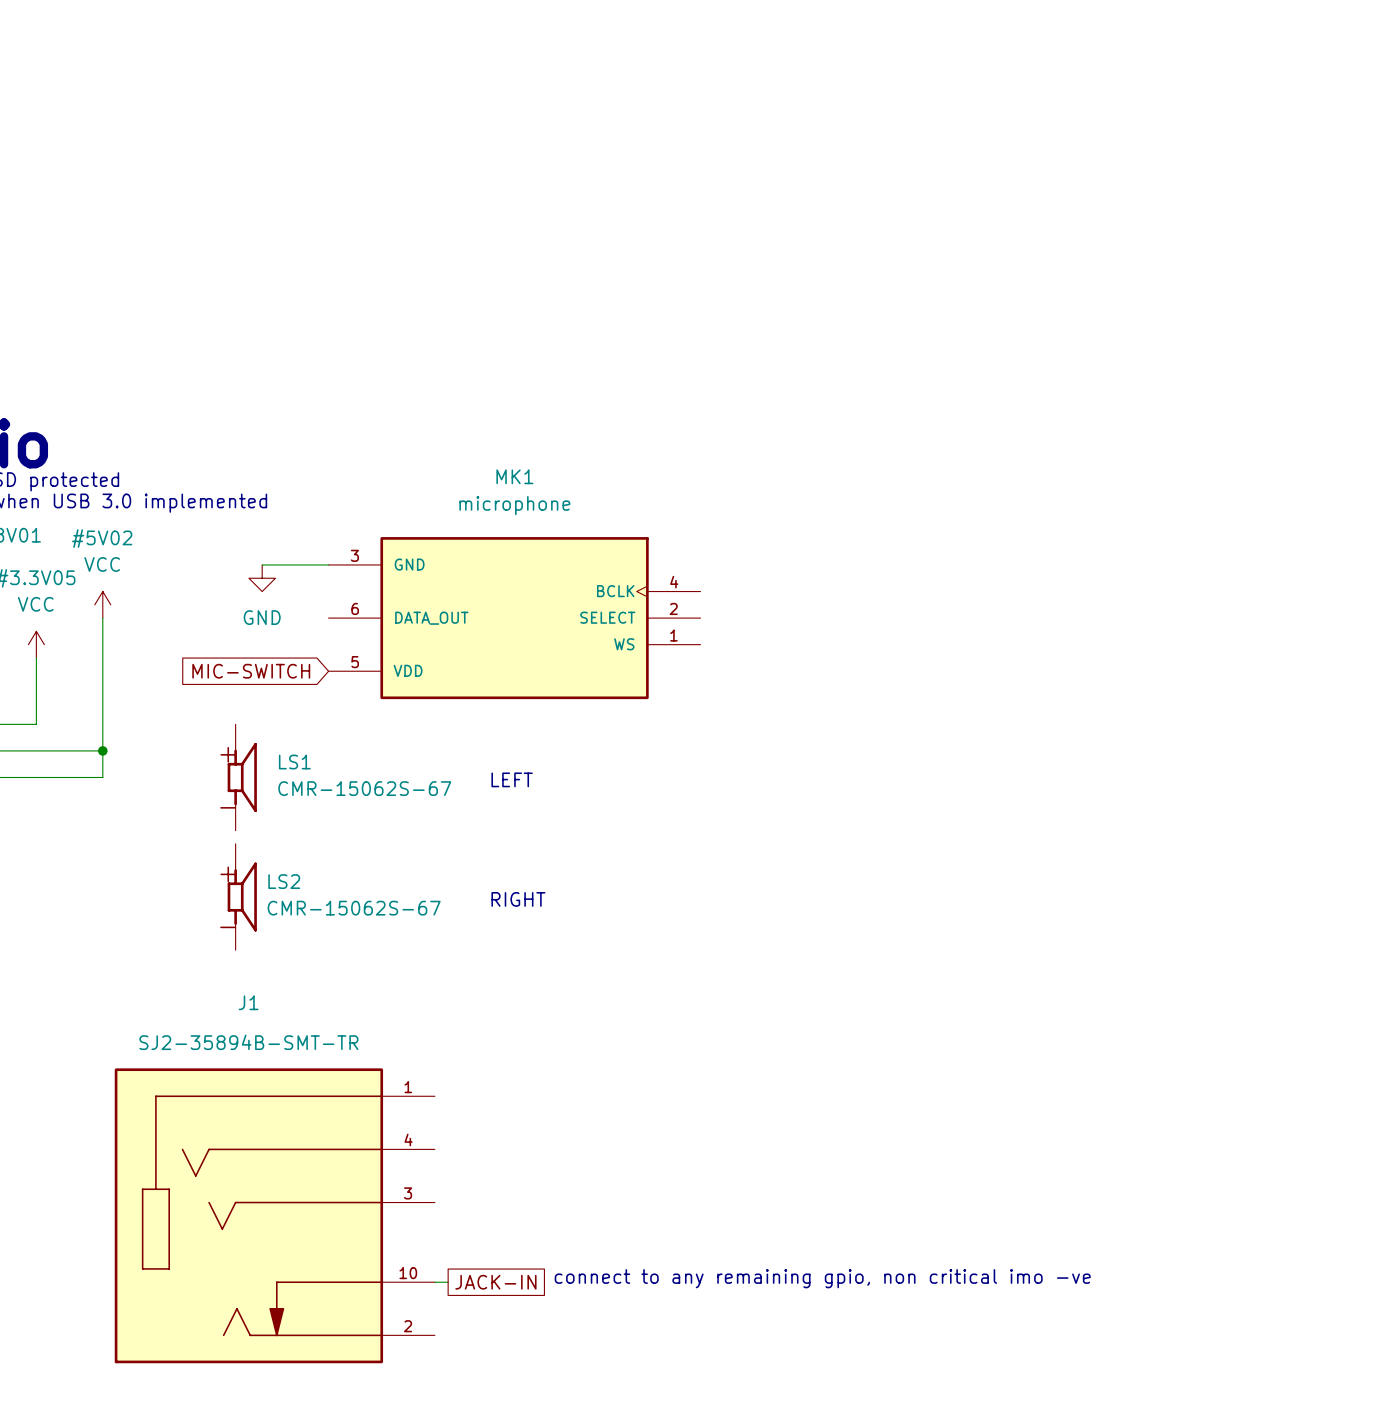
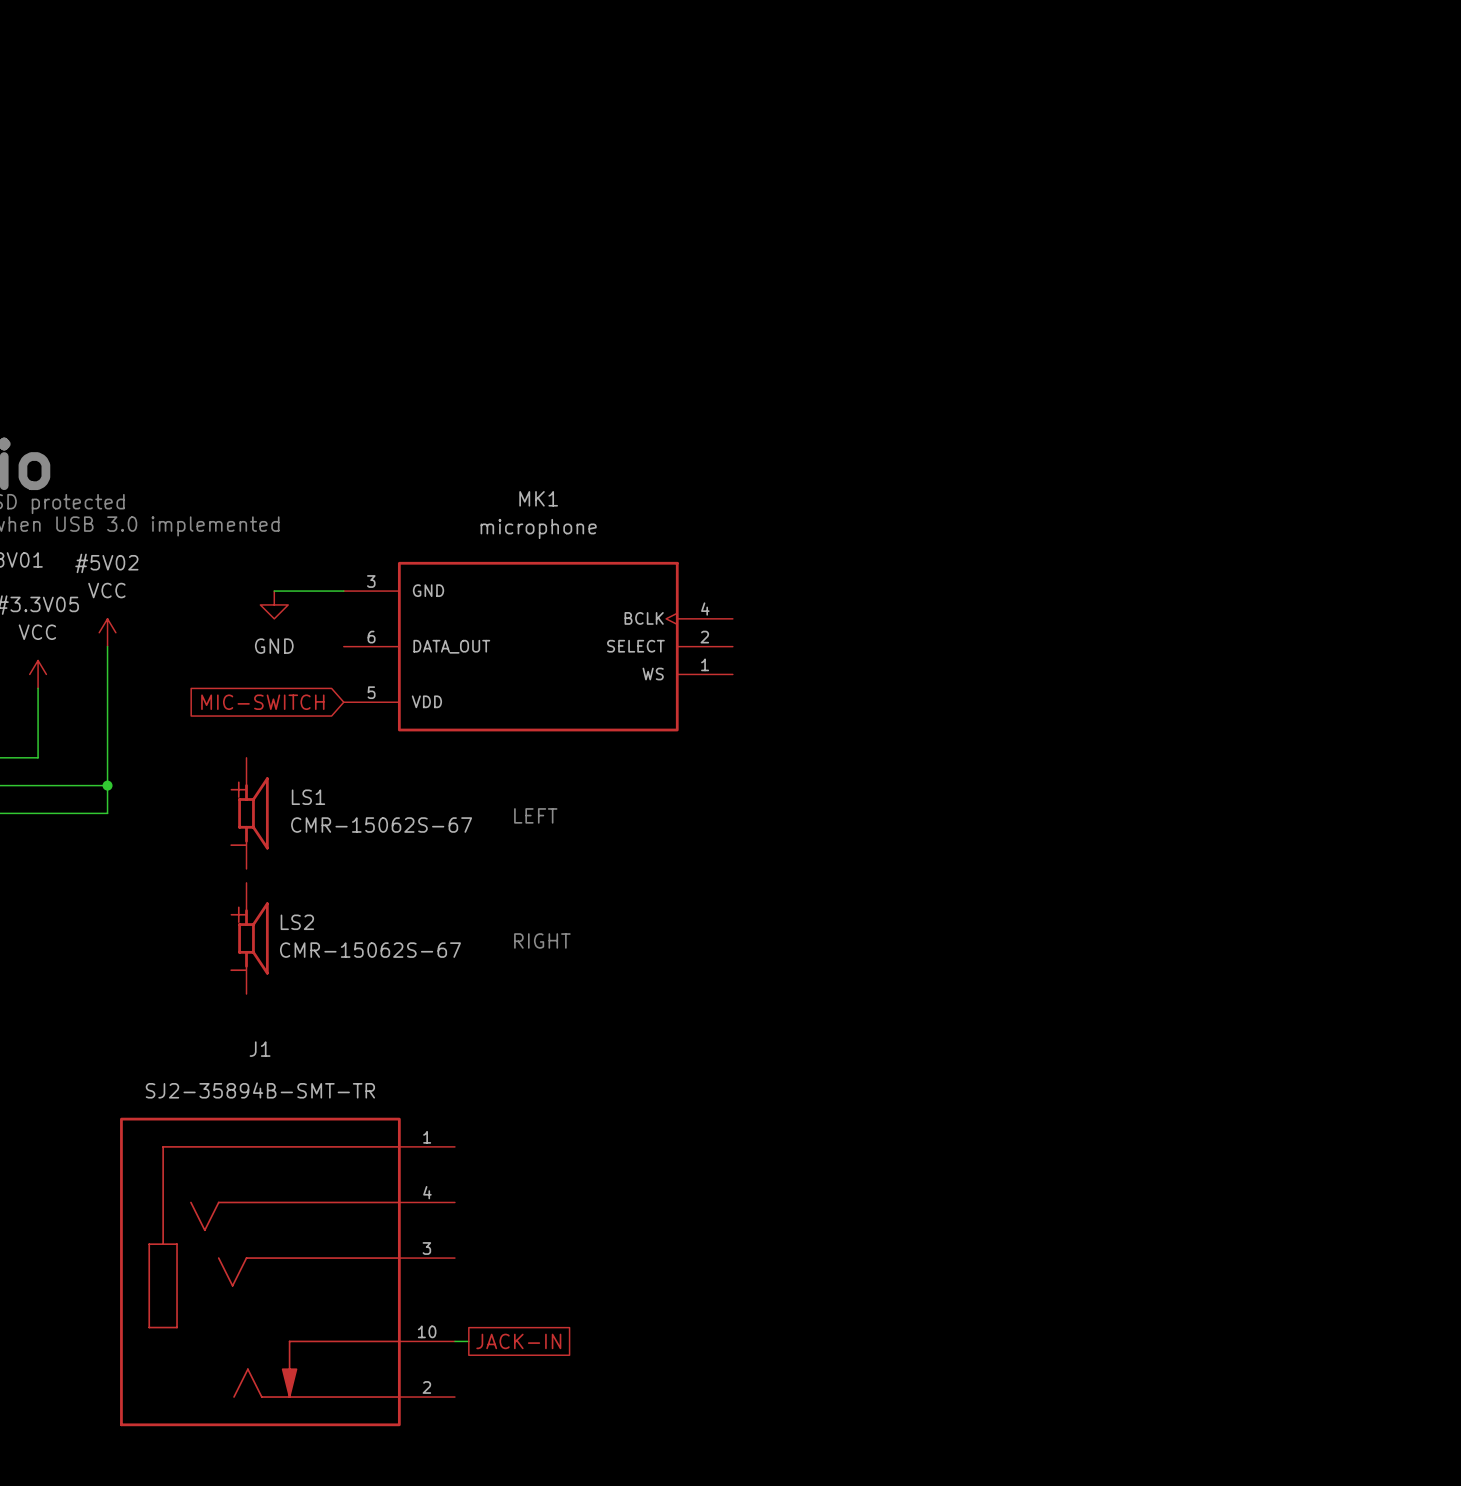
text: connect to any remaining gpio, non critical imo -ve (822, 1278) -> none

